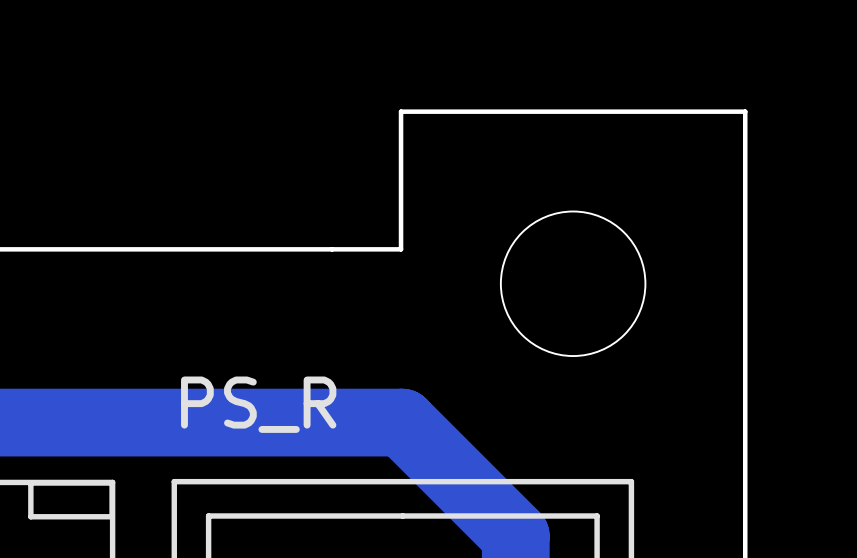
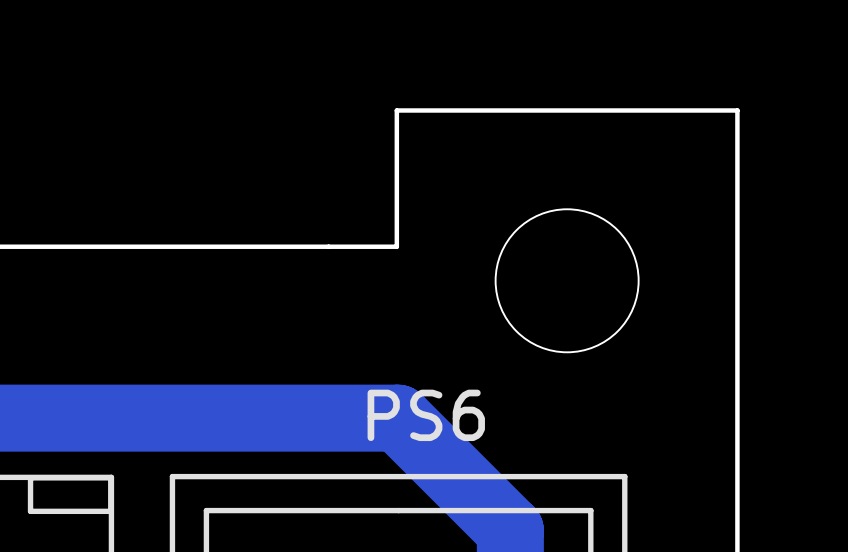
PS_R name: PS_R (258, 404) -> PS6 (426, 415)

